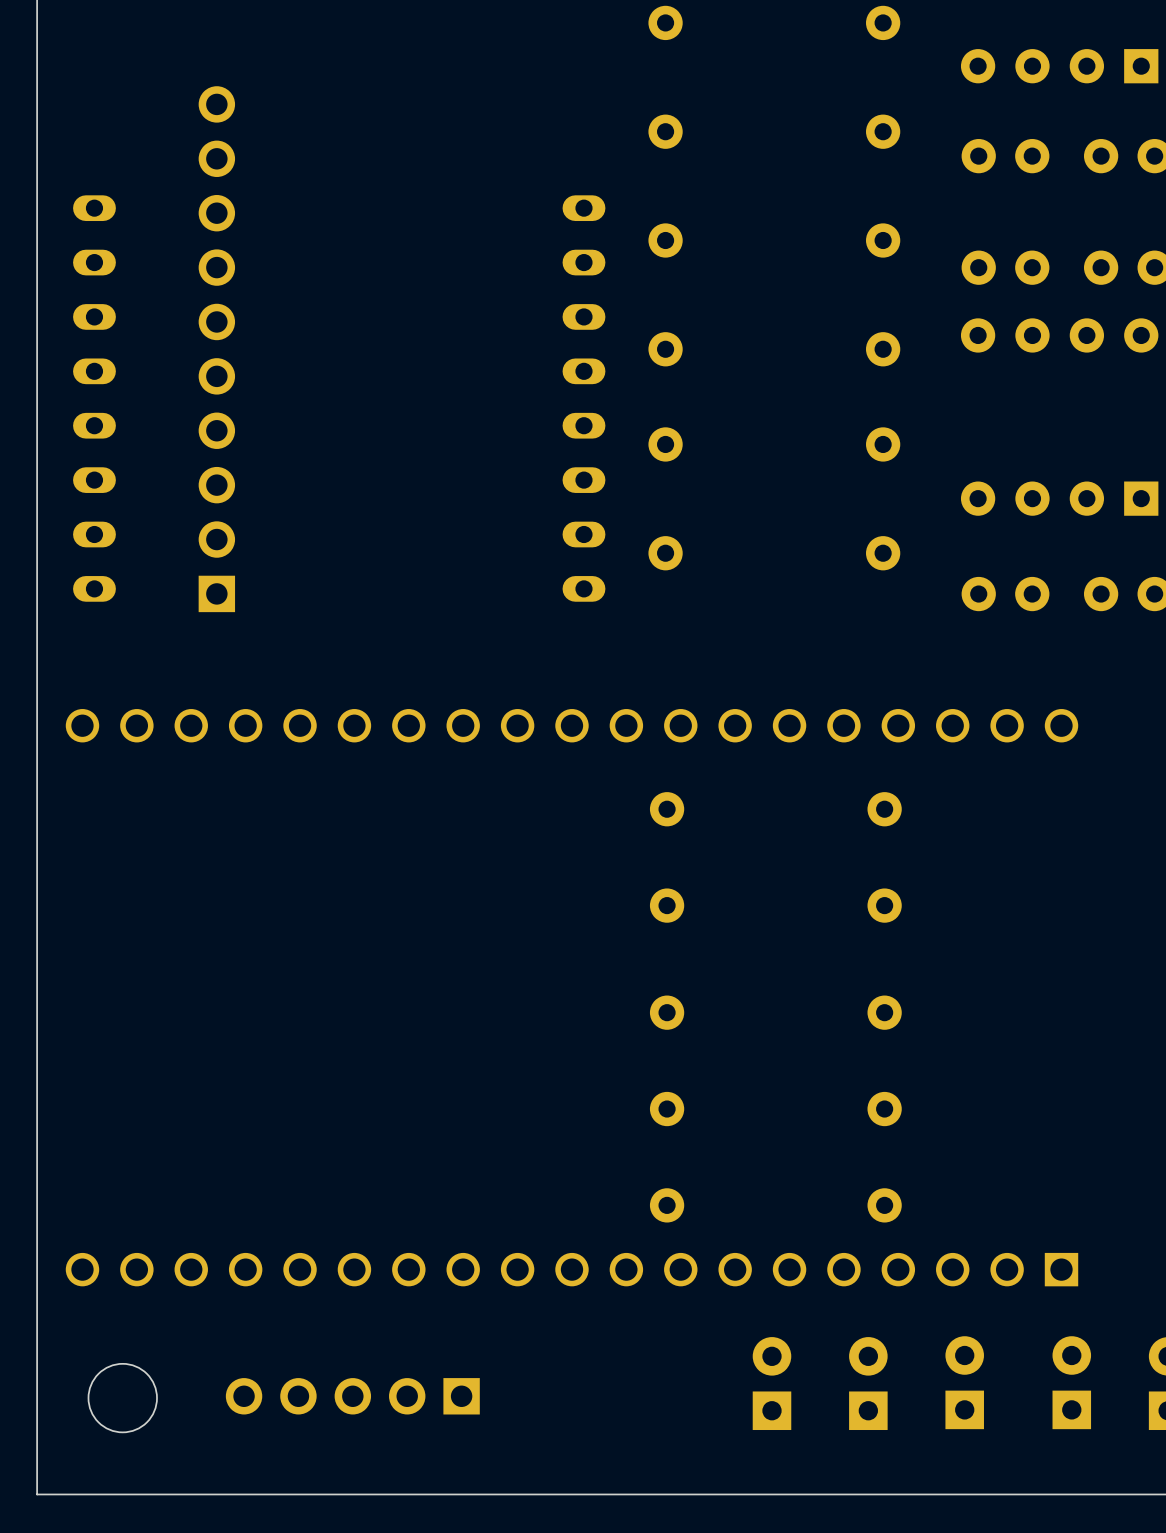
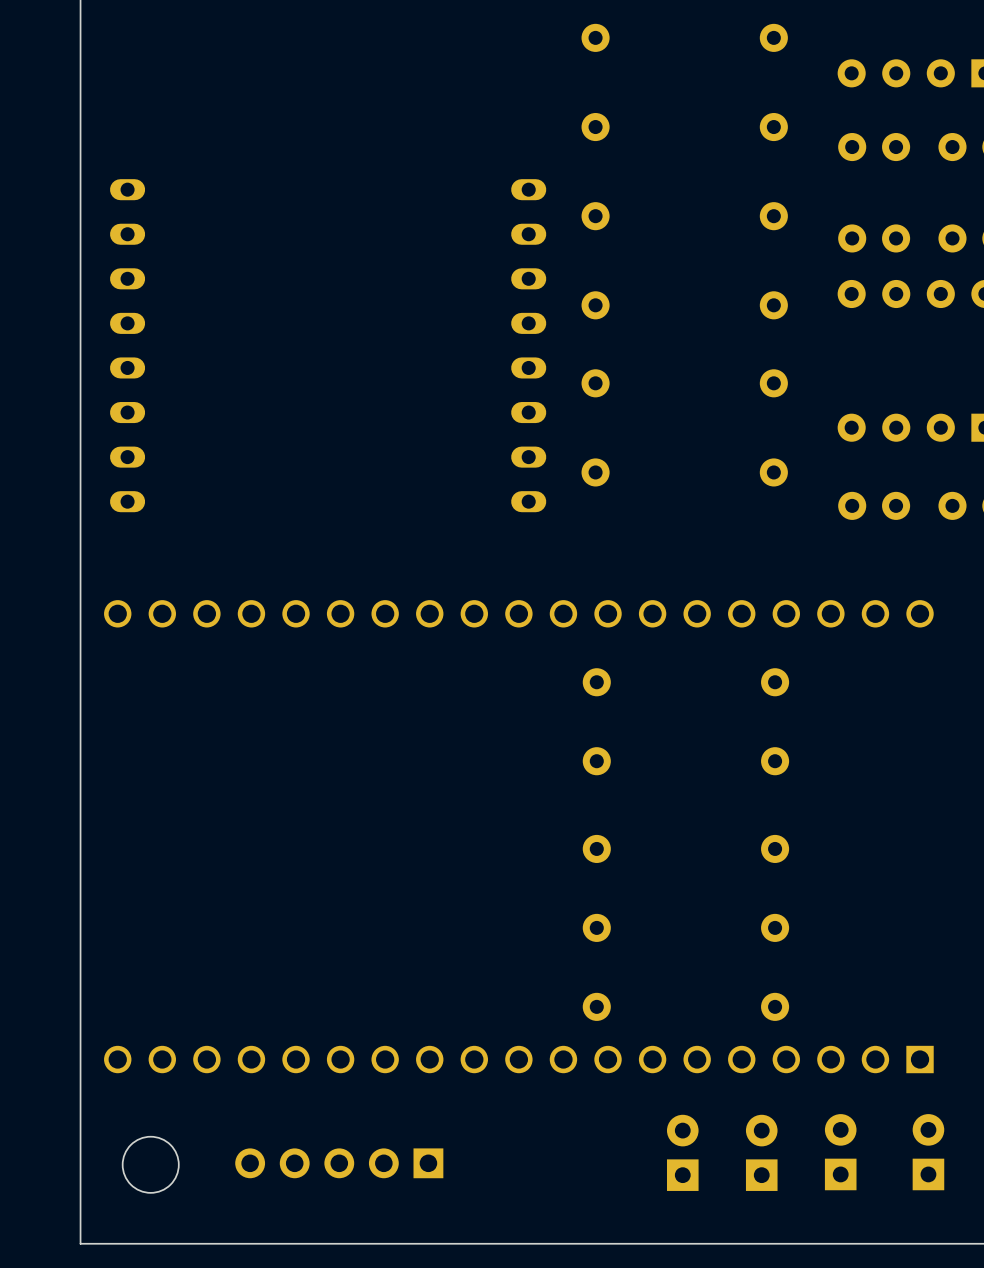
part: (216, 349) -> none

